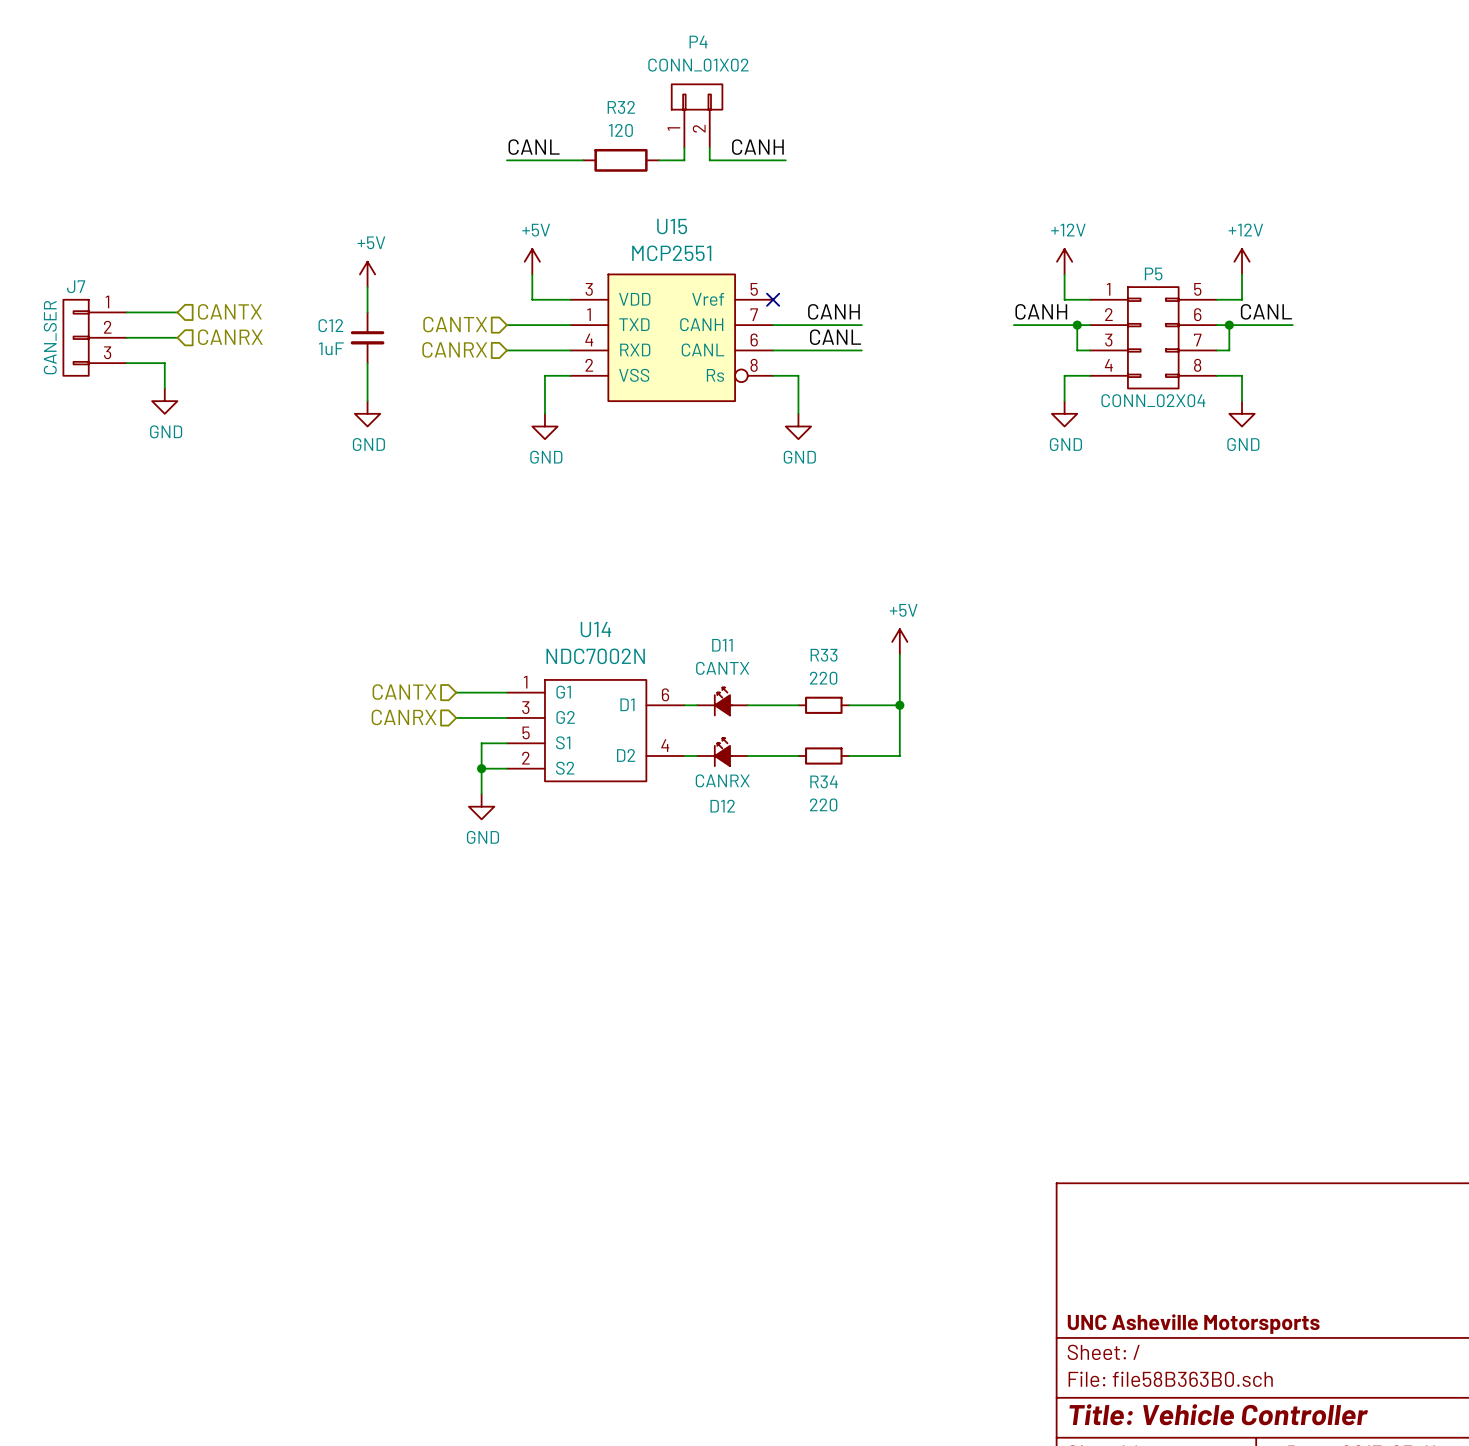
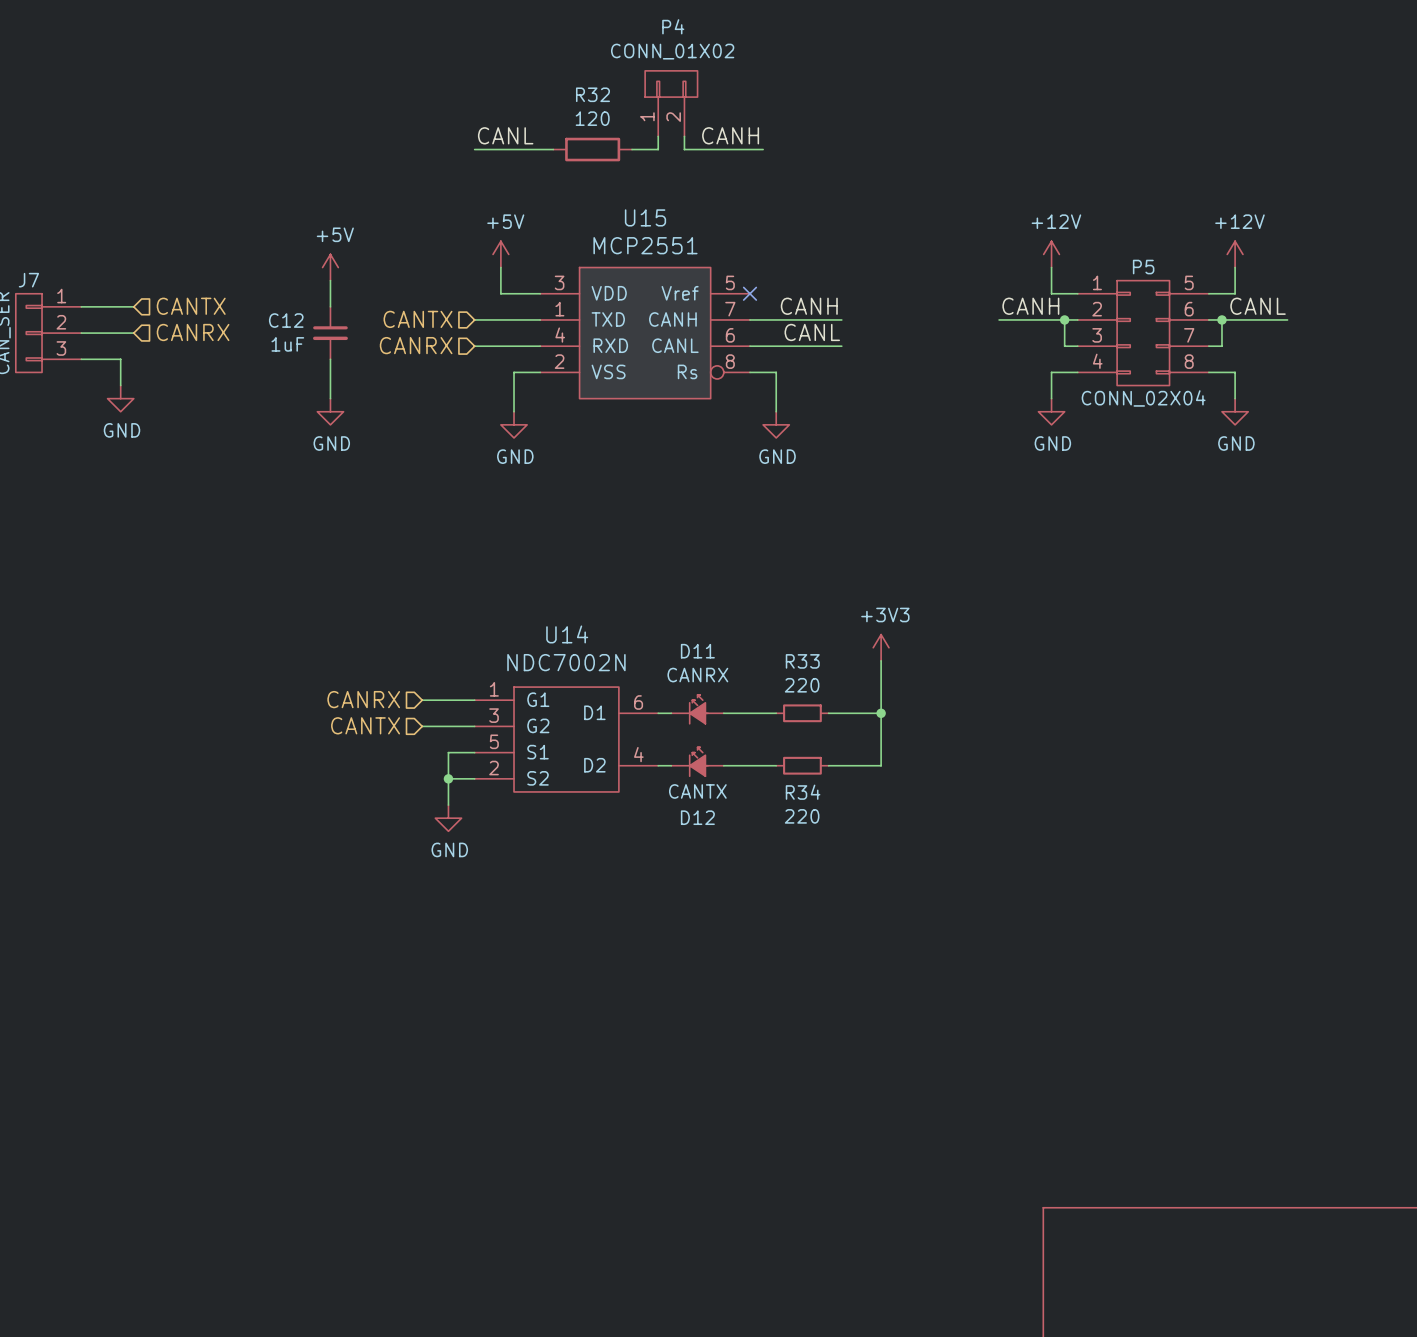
power symbol: +5V (899, 641) -> +3V3 (881, 647)
D11 value: CANTX (722, 668) -> CANRX (697, 675)
hierarchical label: CANTX (404, 692) -> CANRX (363, 699)
hierarchical label: CANRX (404, 717) -> CANTX (365, 725)
D12 value: CANRX (722, 780) -> CANTX (697, 791)

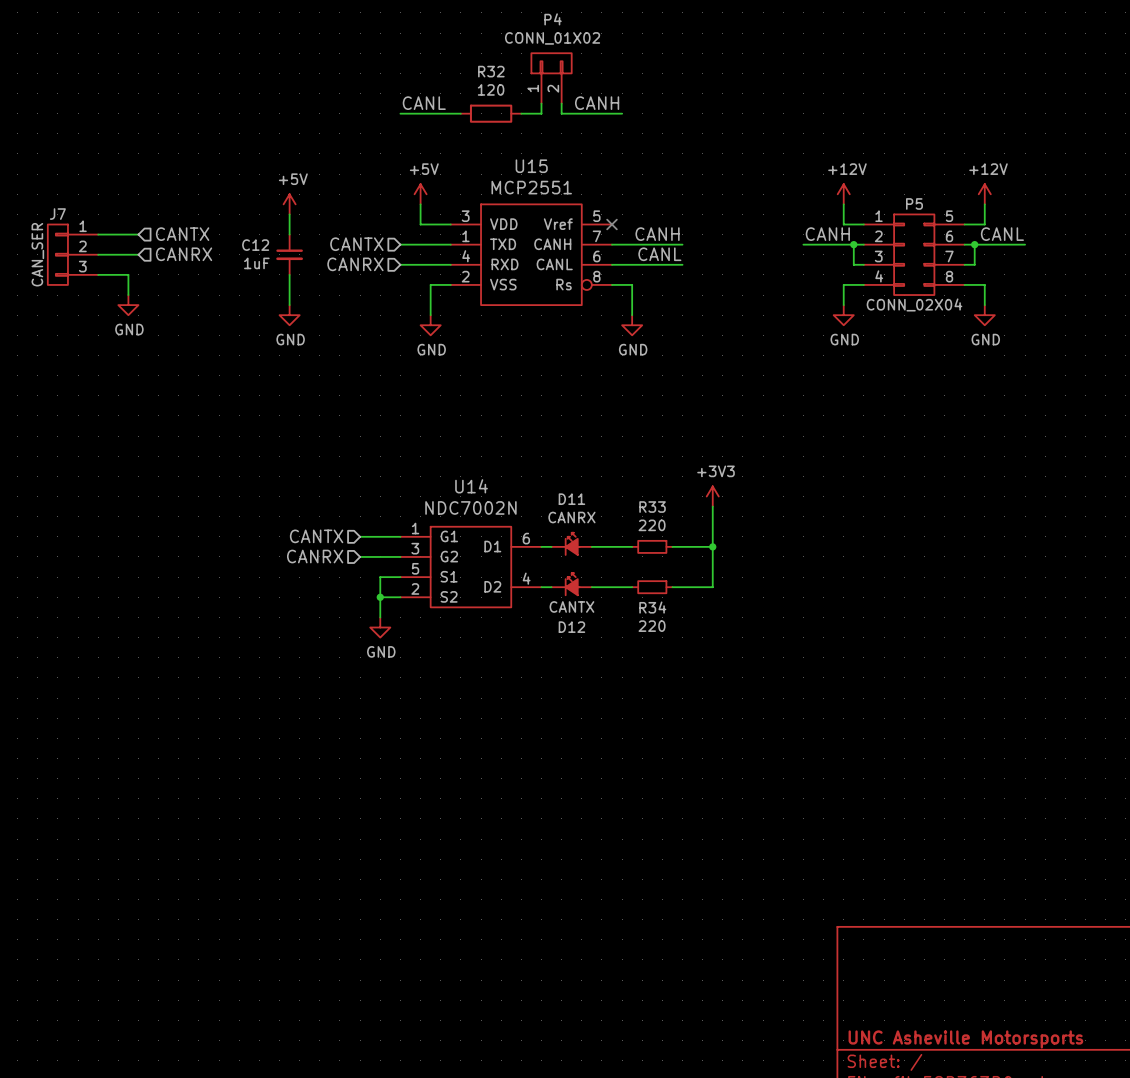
hierarchical label: CANRX (363, 699) -> CANTX (316, 536)
hierarchical label: CANTX (365, 725) -> CANRX (315, 556)

